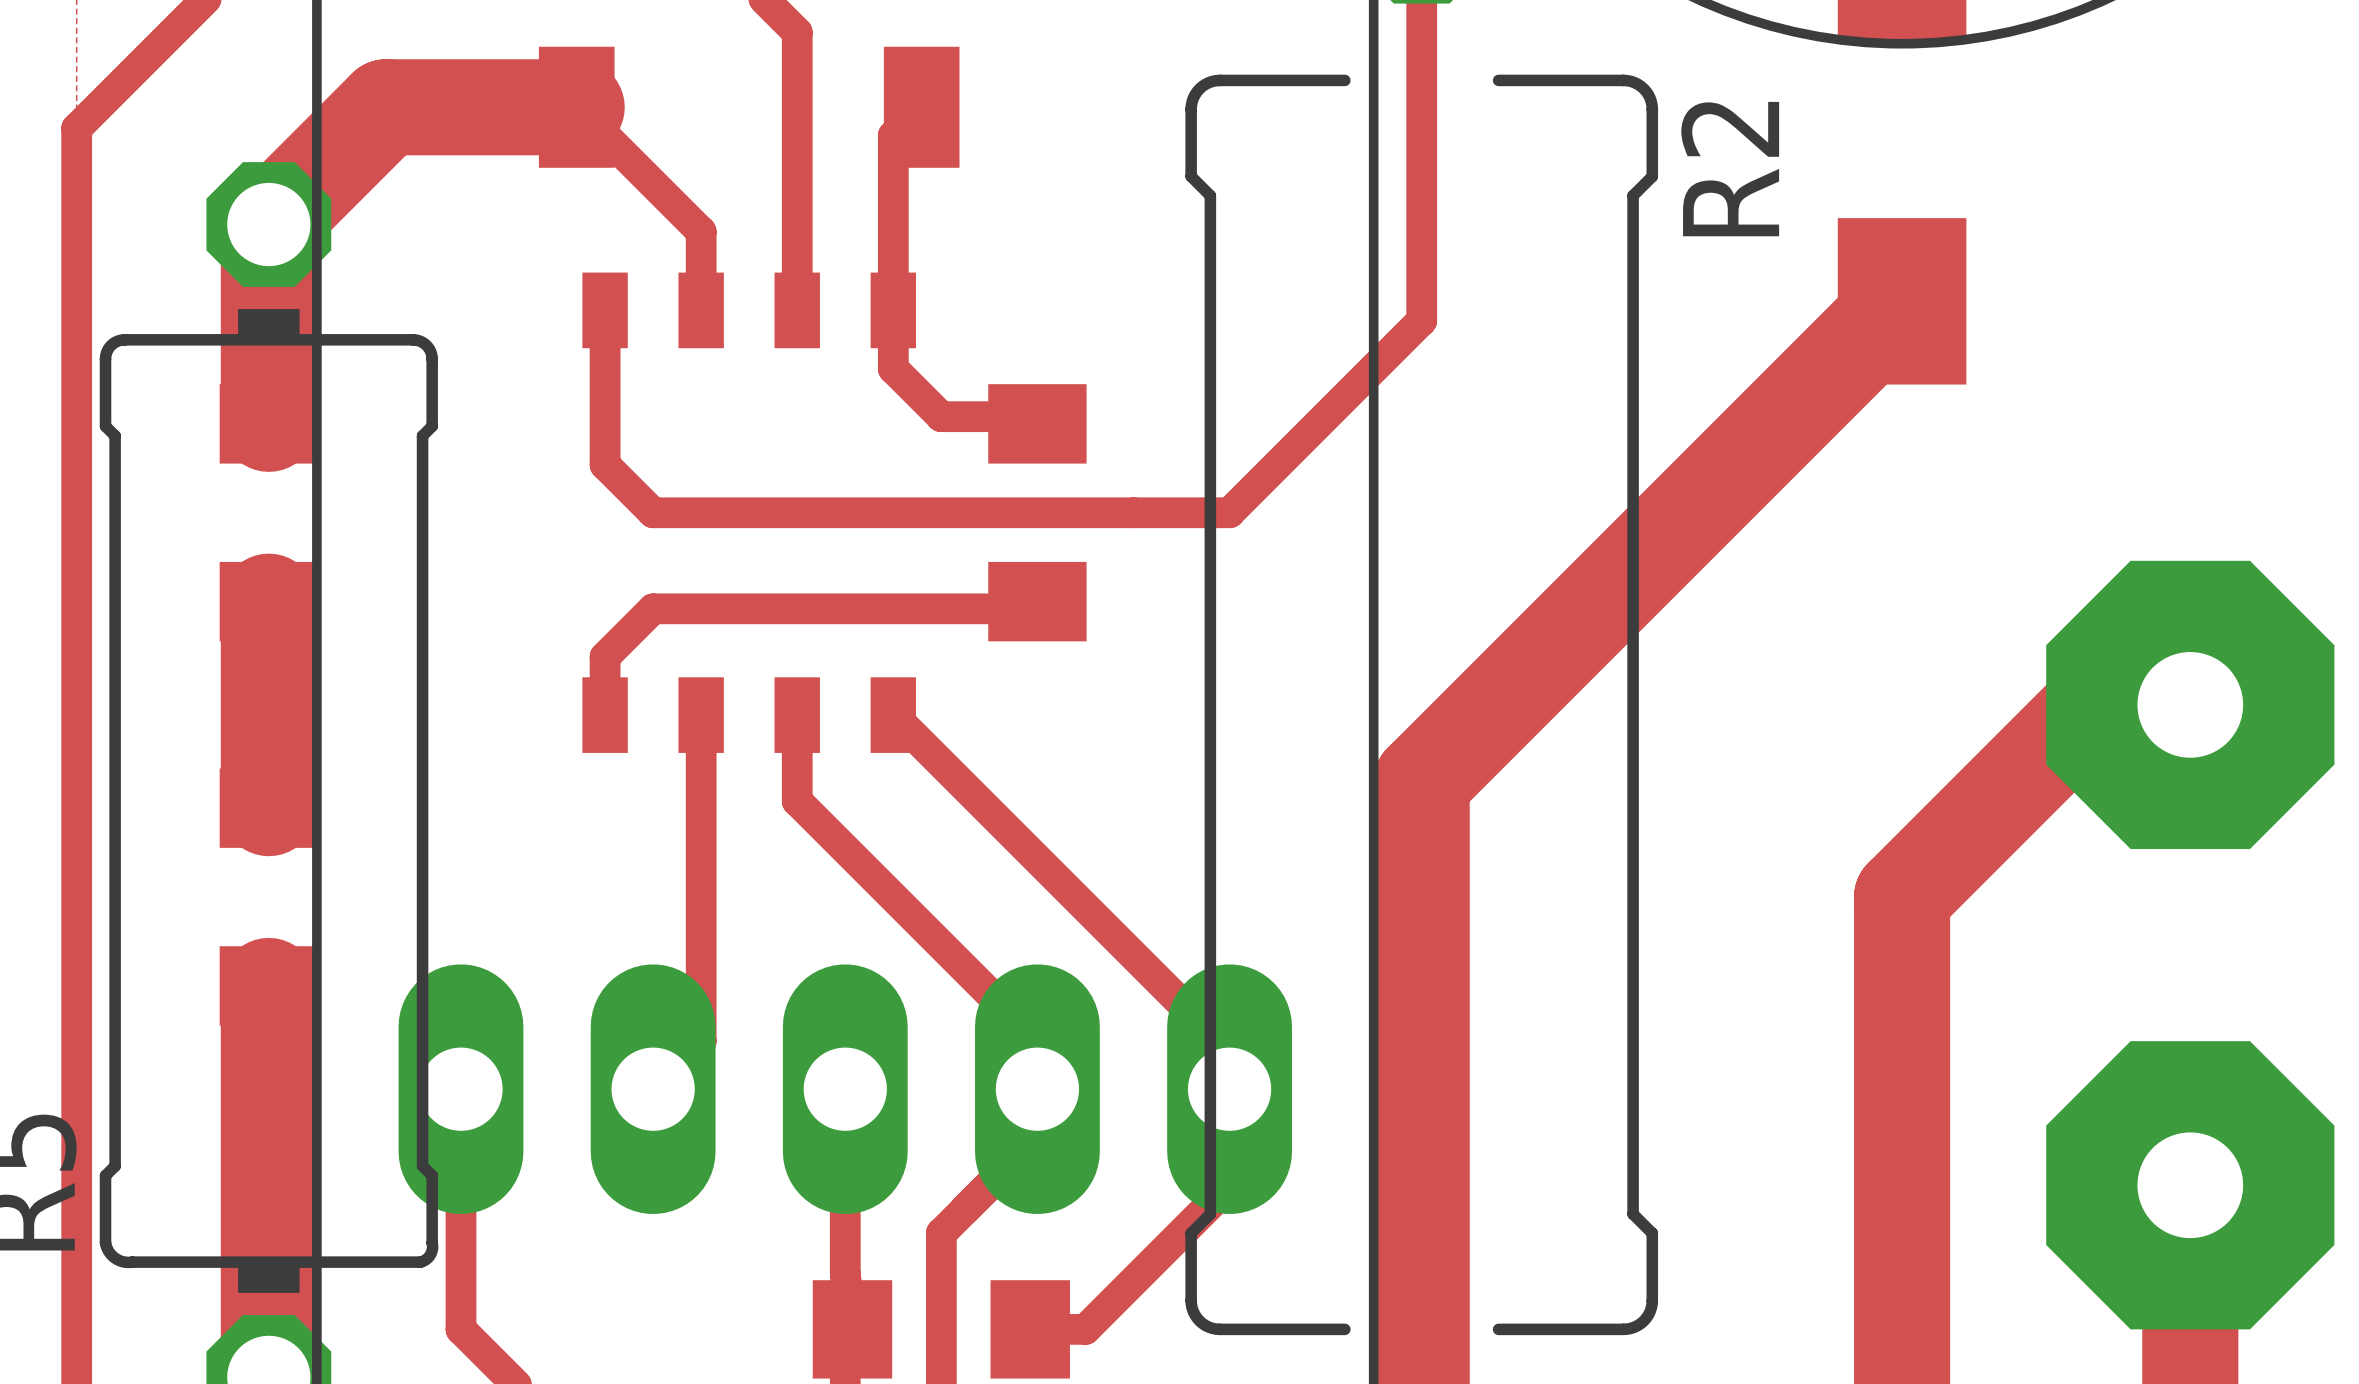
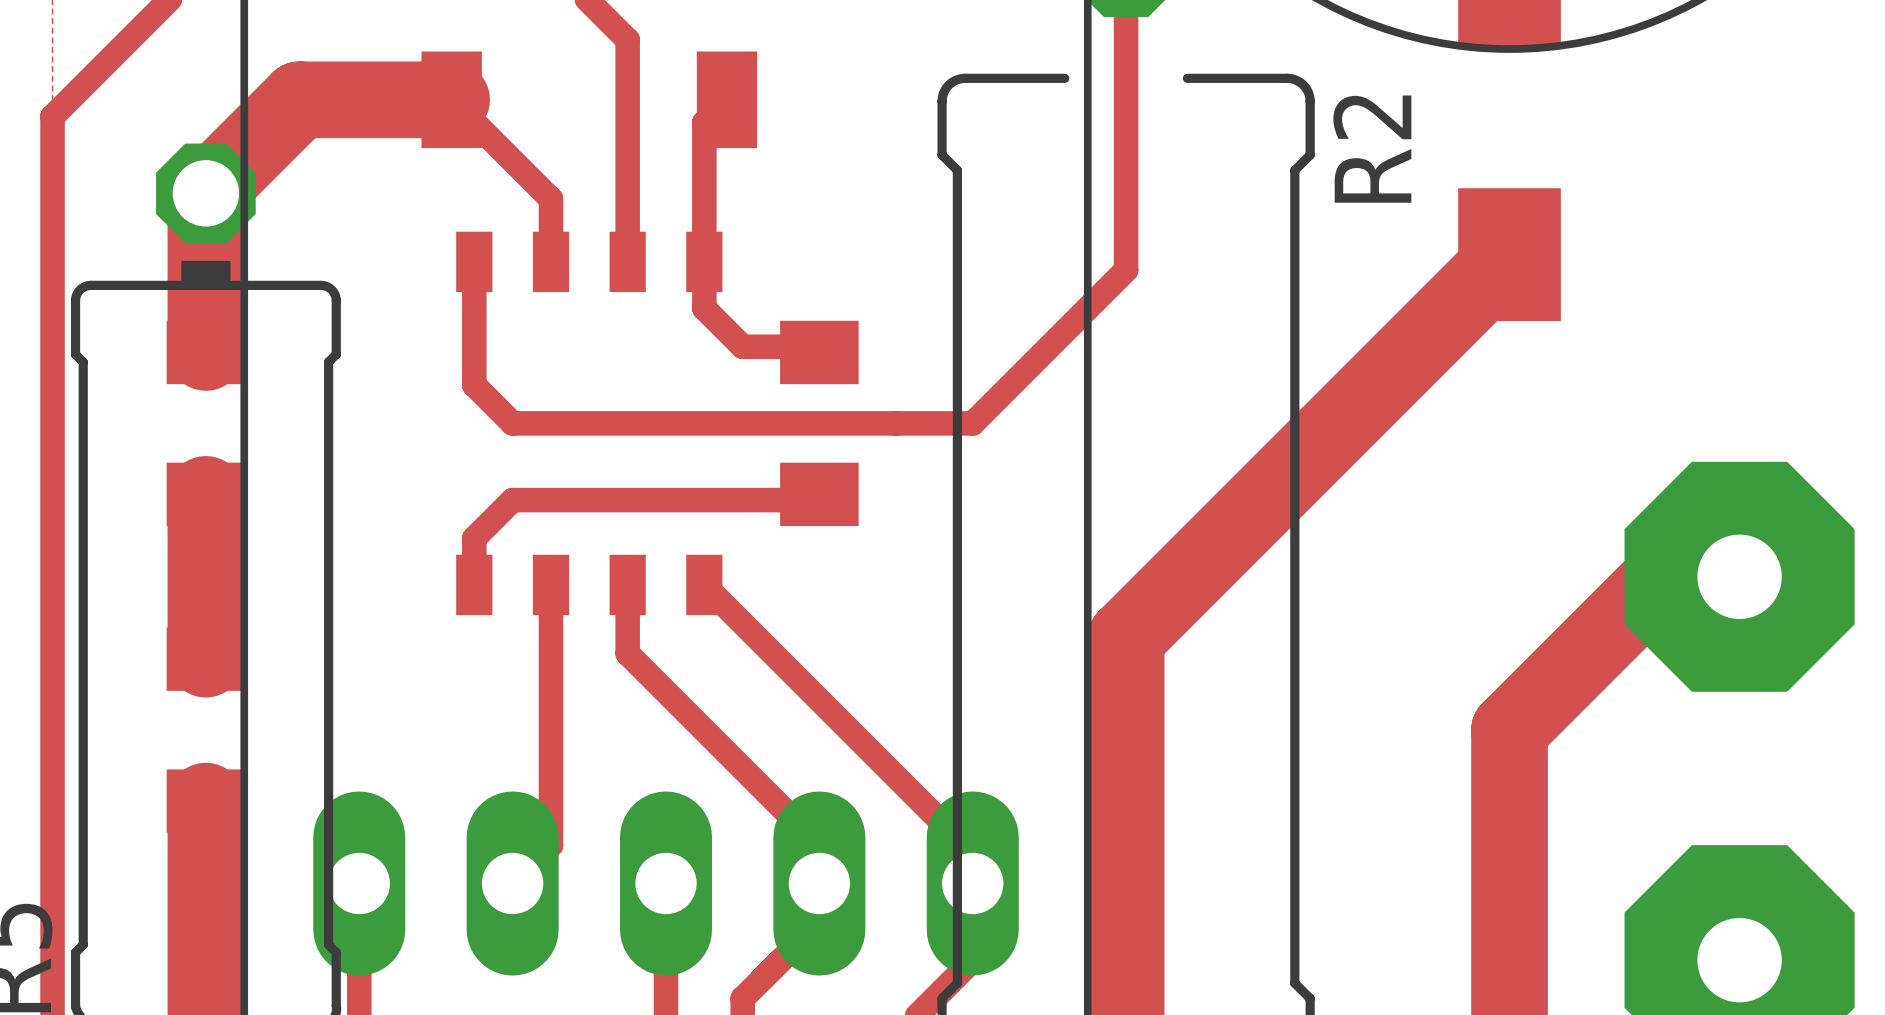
part footprint: [398, 964, 908, 1215] -> [313, 791, 713, 976]
part footprint: [975, 964, 1292, 1215] -> [773, 791, 1019, 976]

